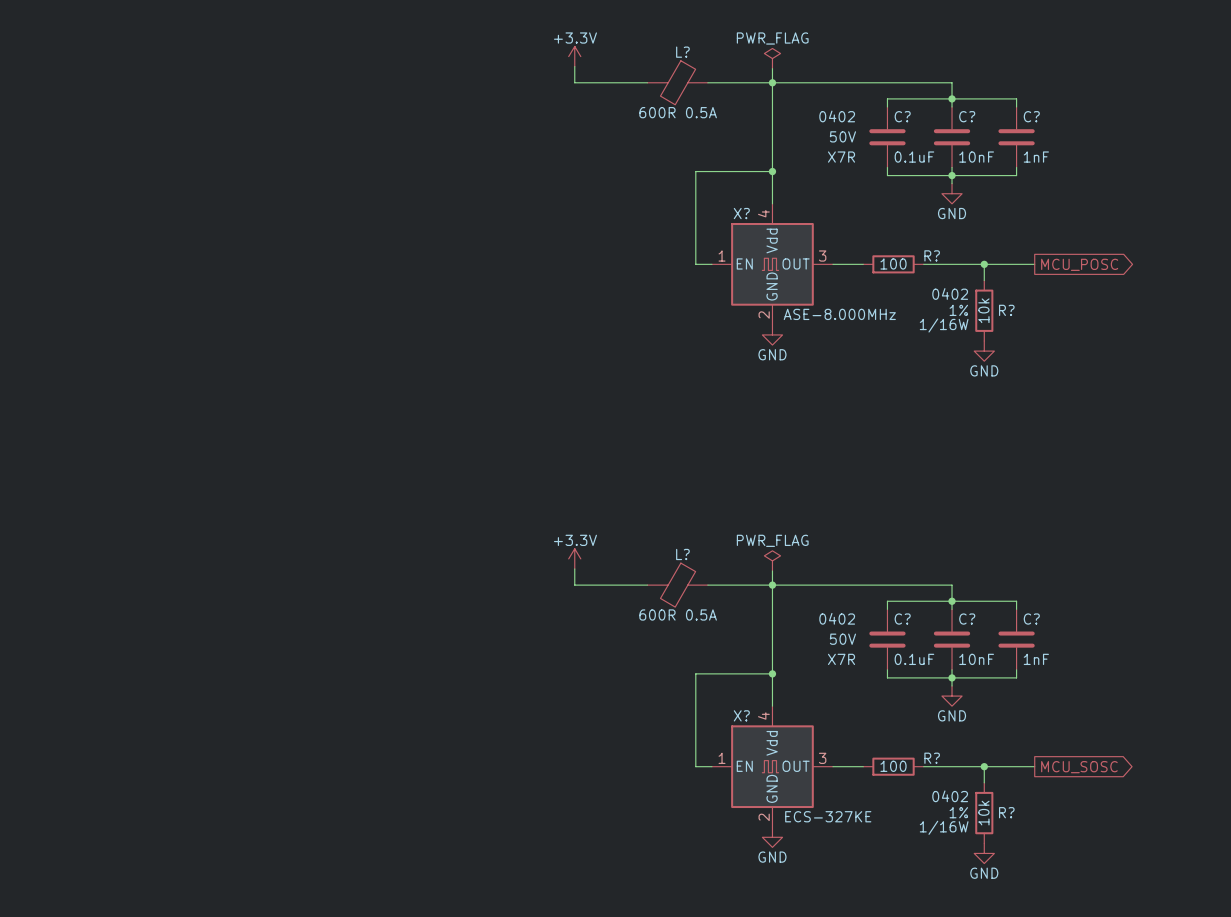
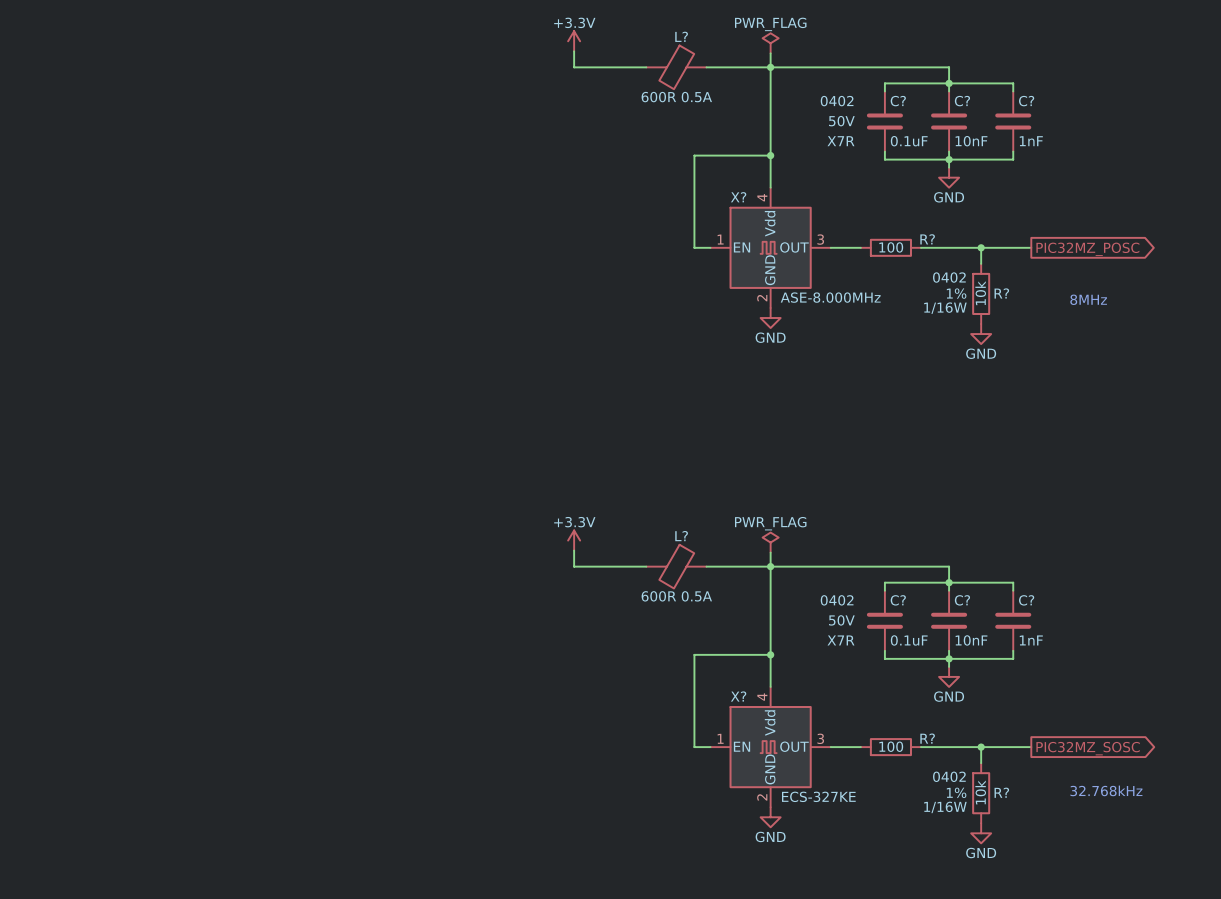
global label: MCU_POSC (1079, 264) -> PIC32MZ_POSC (1087, 249)
text: none -> 8MHz (1088, 299)
global label: MCU_SOSC (1079, 767) -> PIC32MZ_SOSC (1088, 748)
text: none -> 32.768kHz (1106, 790)

